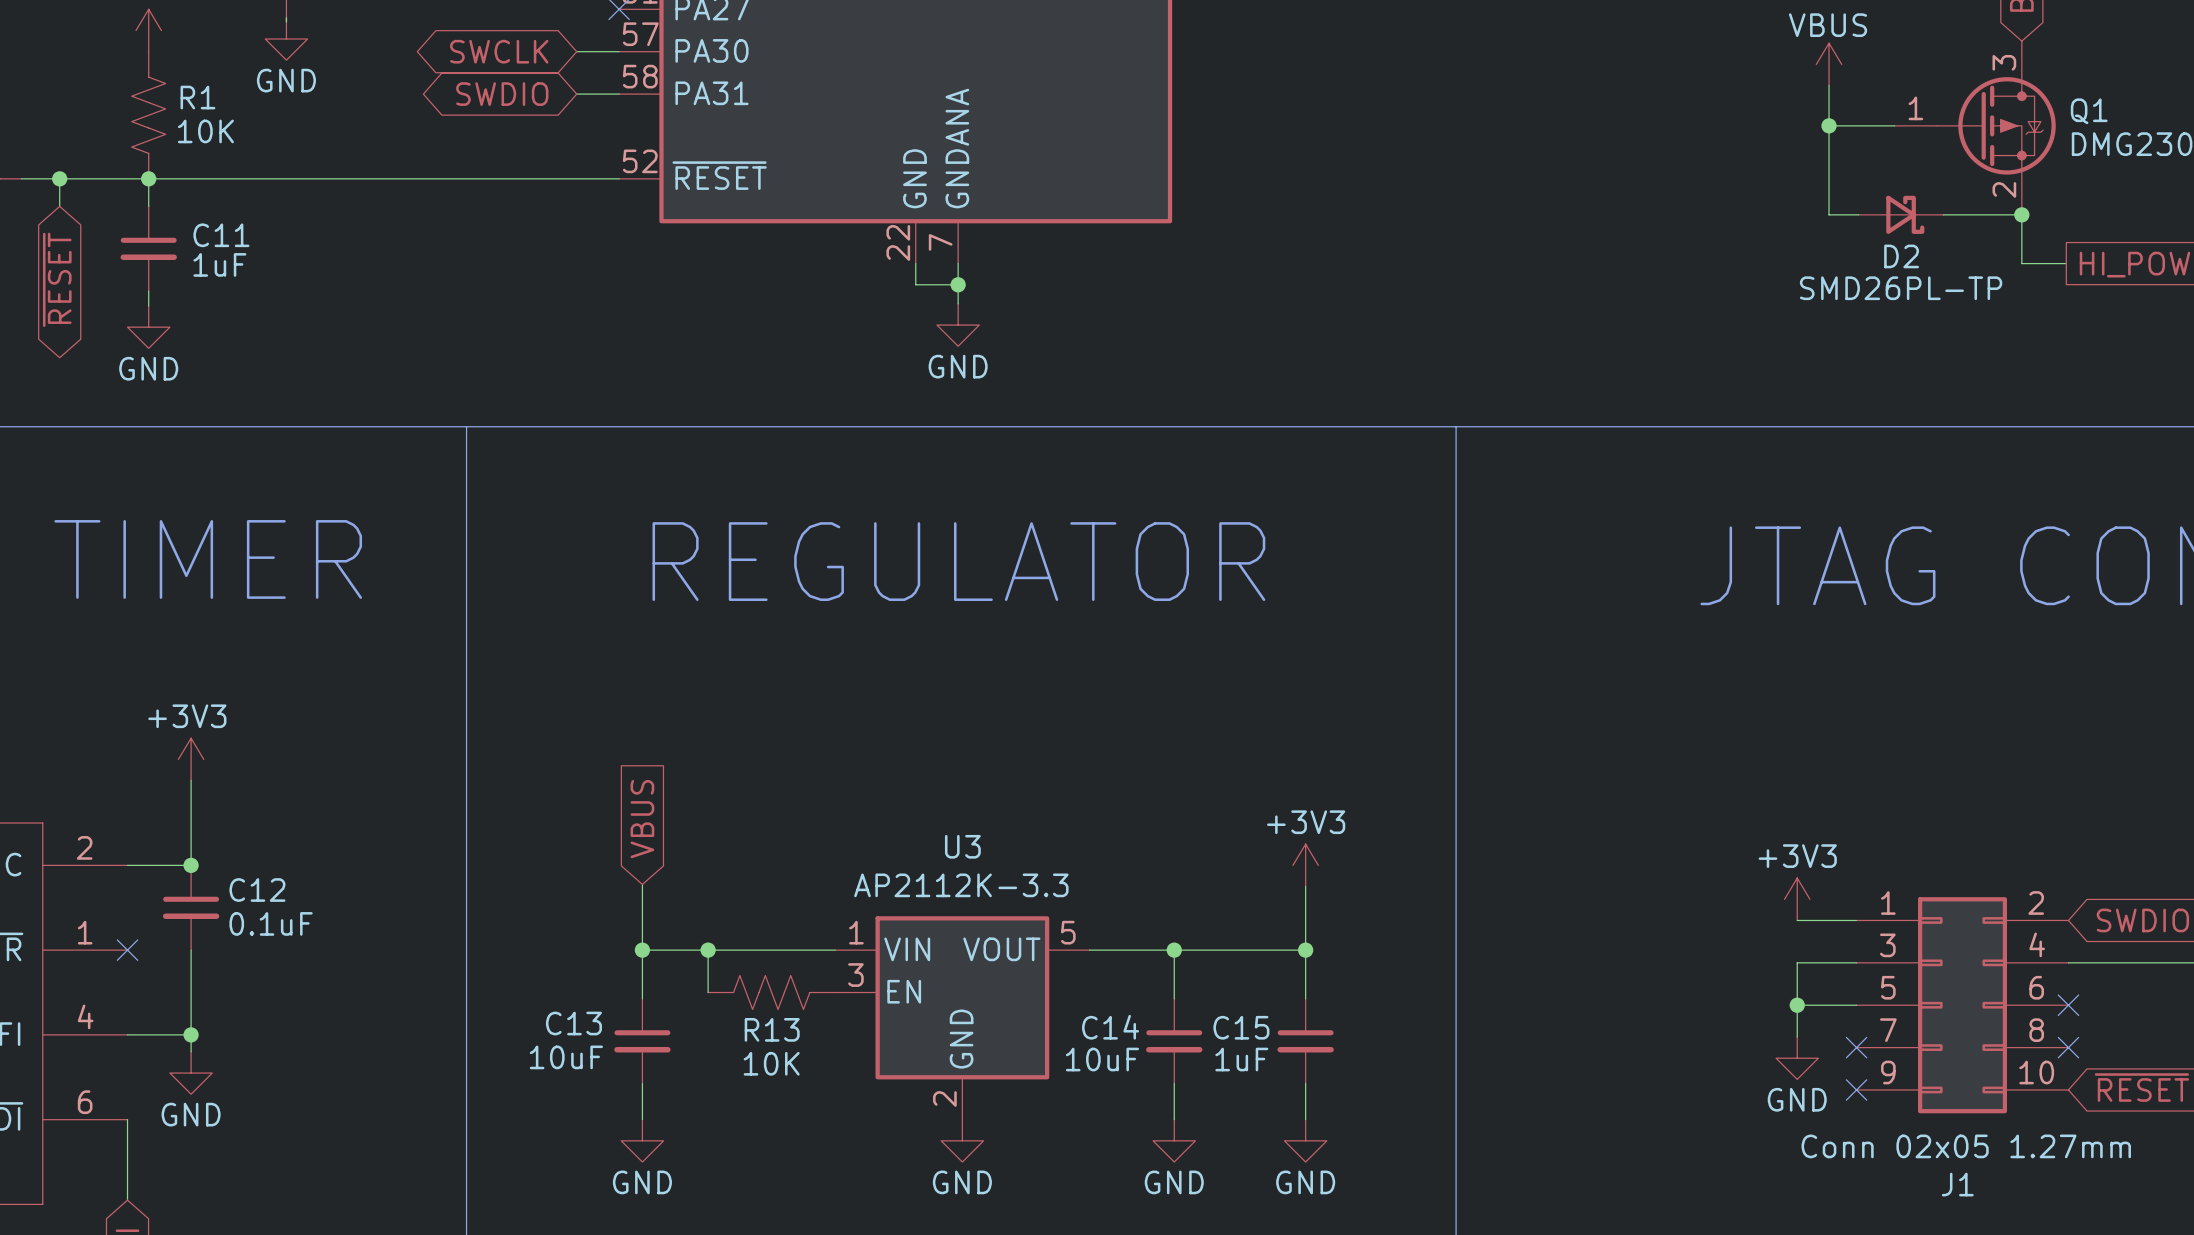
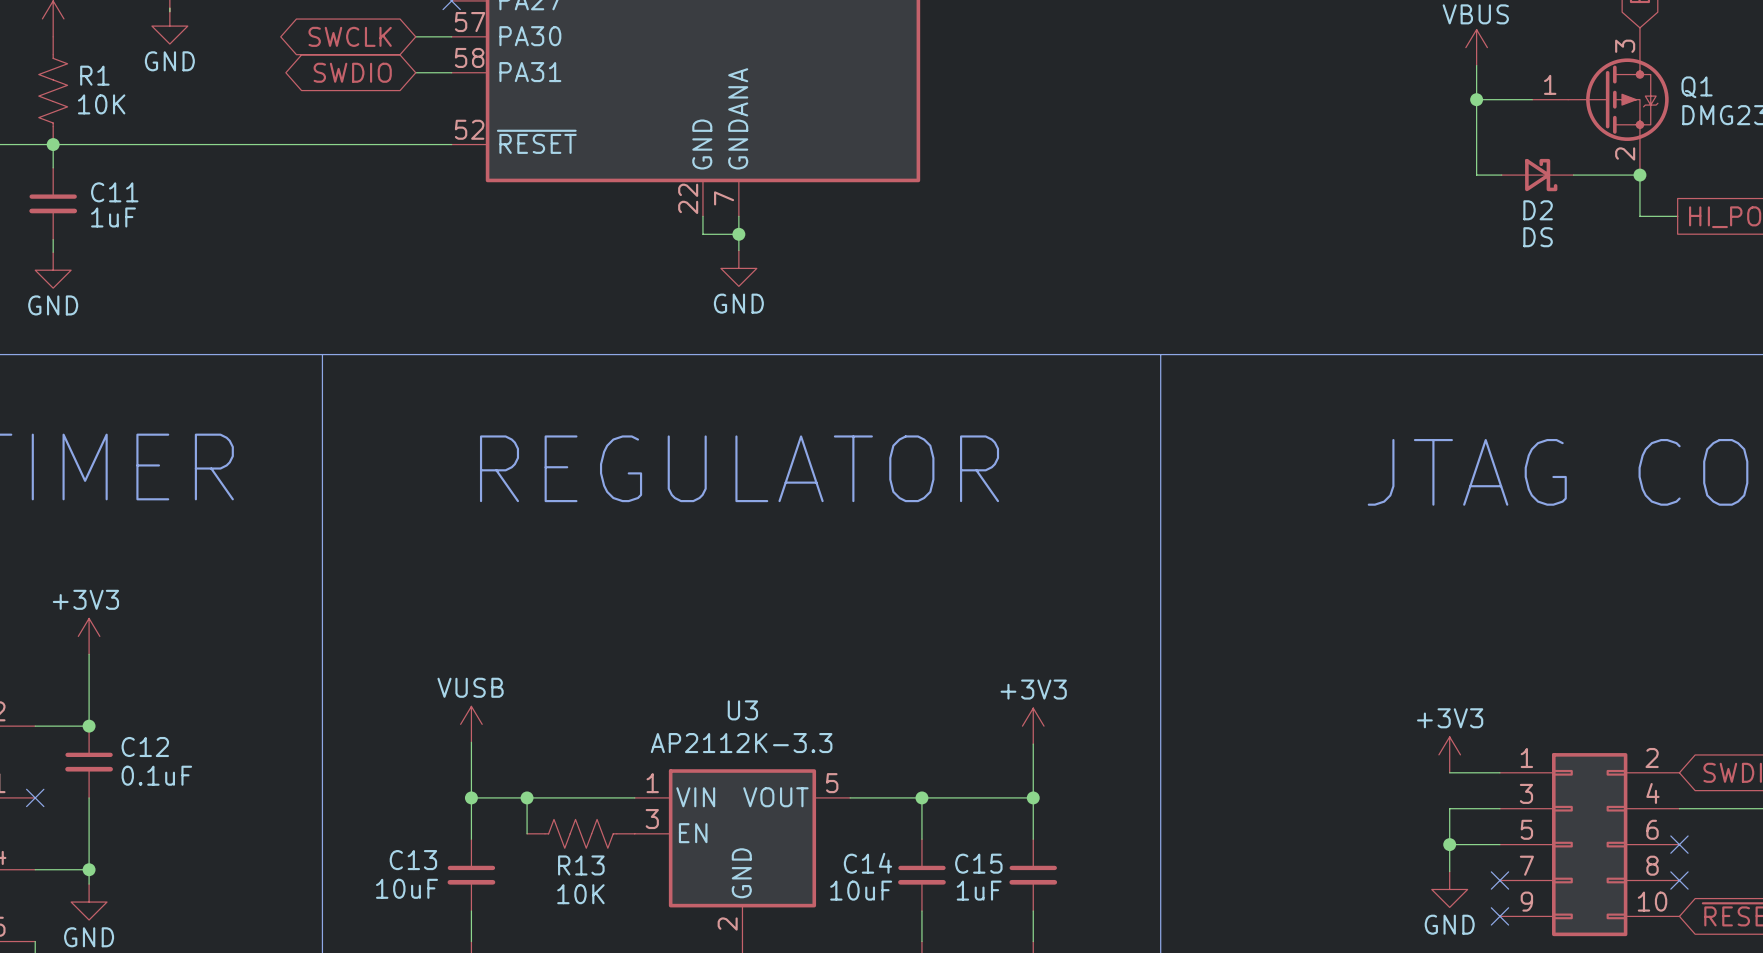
D2 value: SMD26PL-TP (1901, 288) -> DS (1538, 237)
global label: VBUS (642, 819) -> none
power symbol: none -> VUSB (471, 724)

